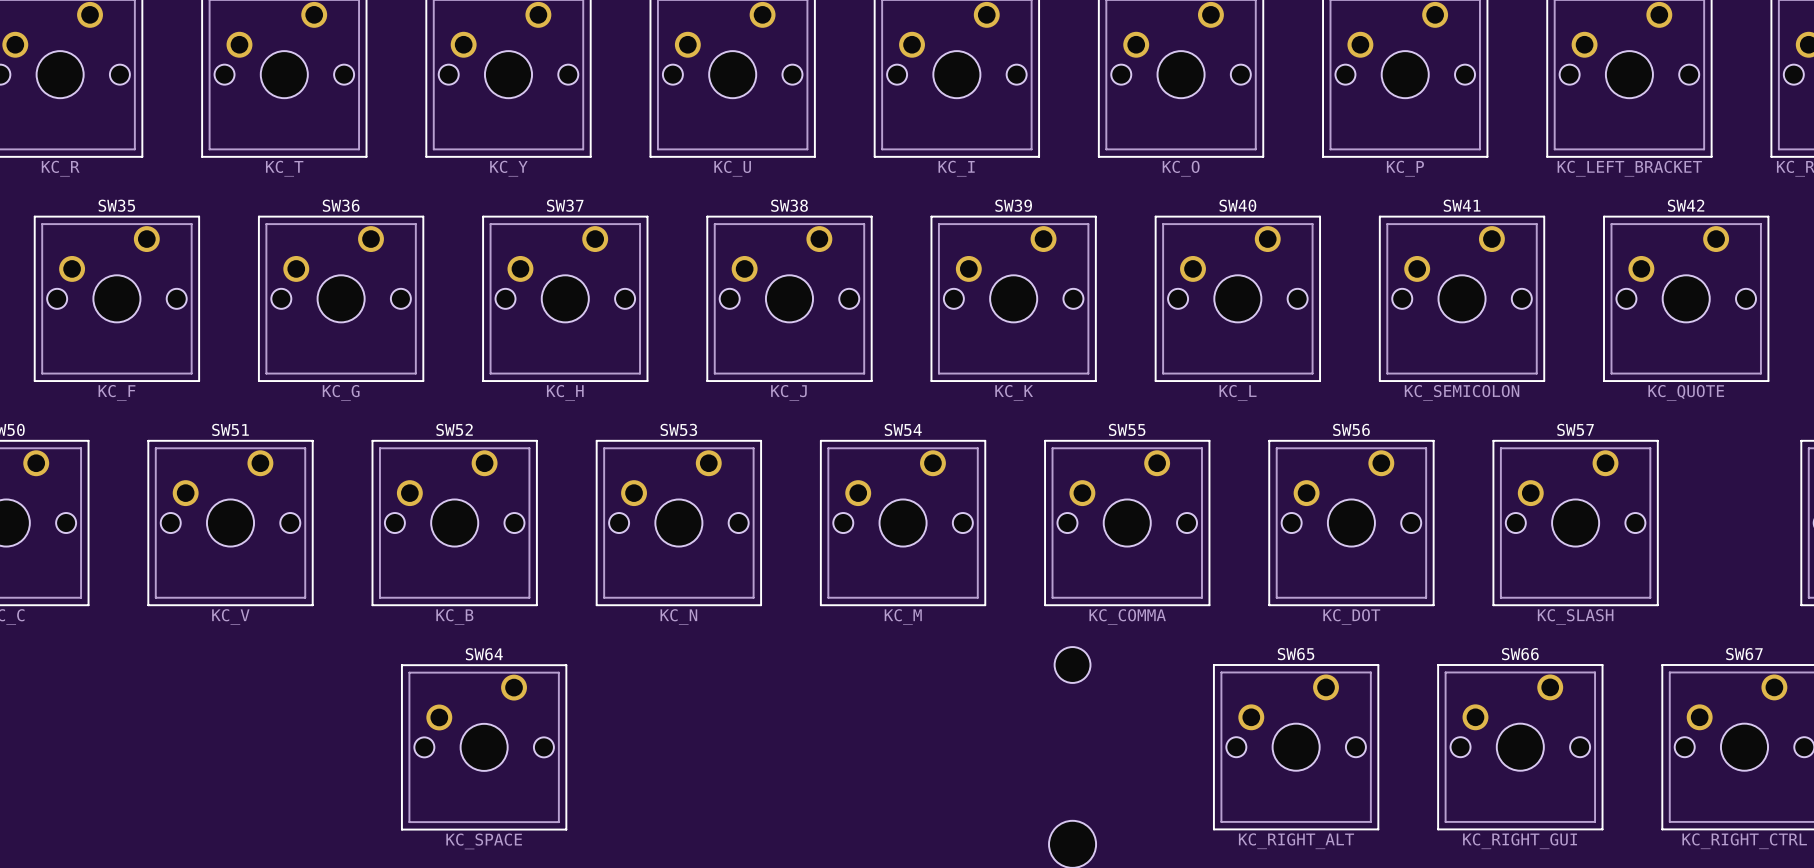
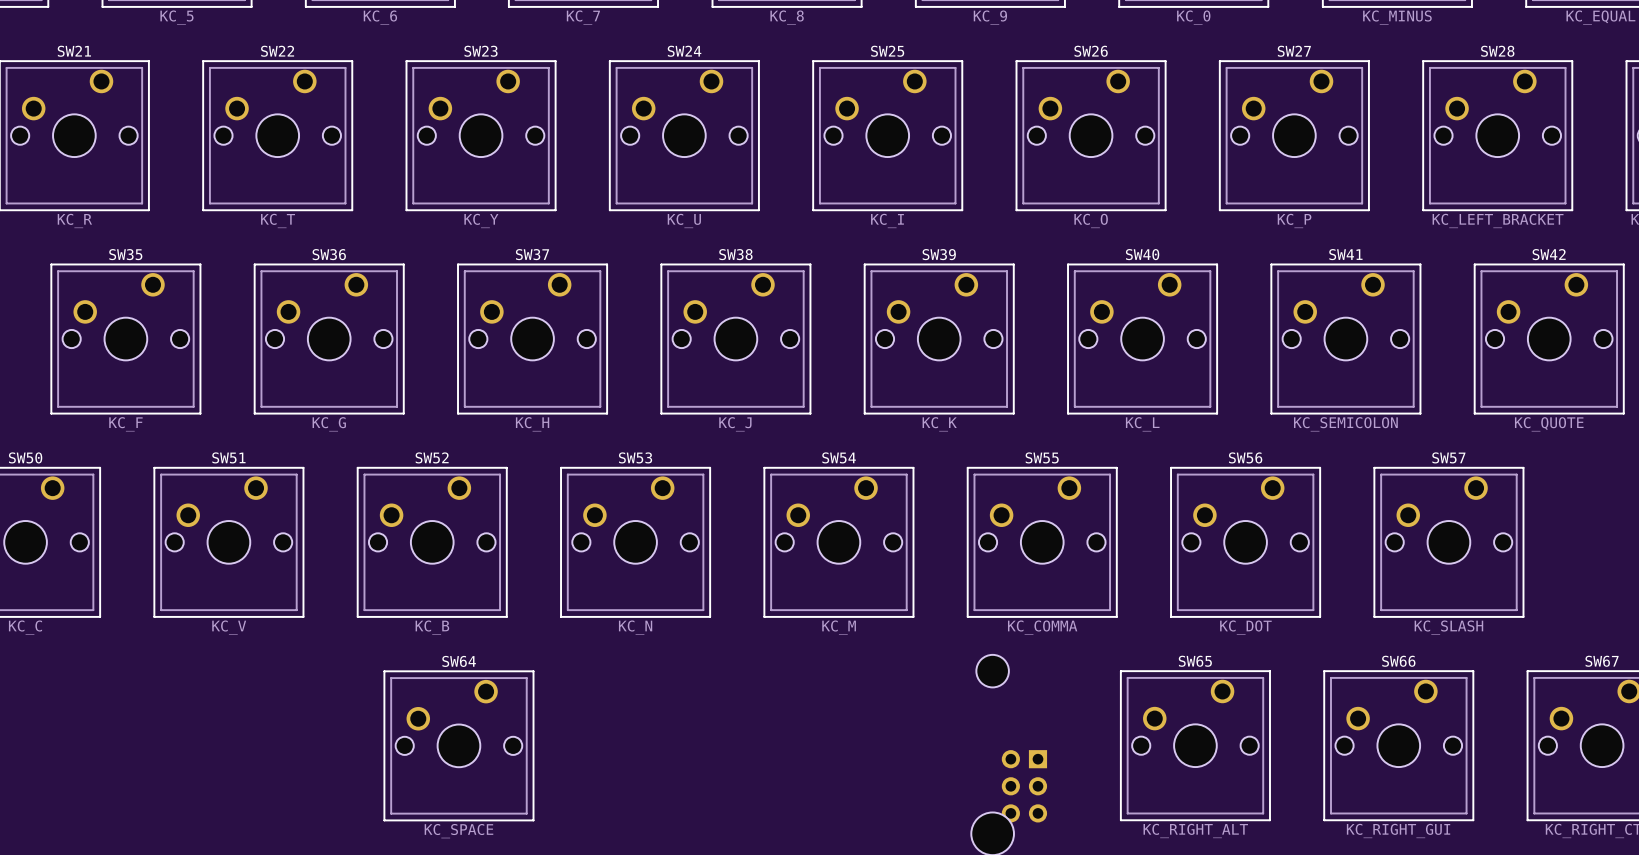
part: none -> (1024, 786)

